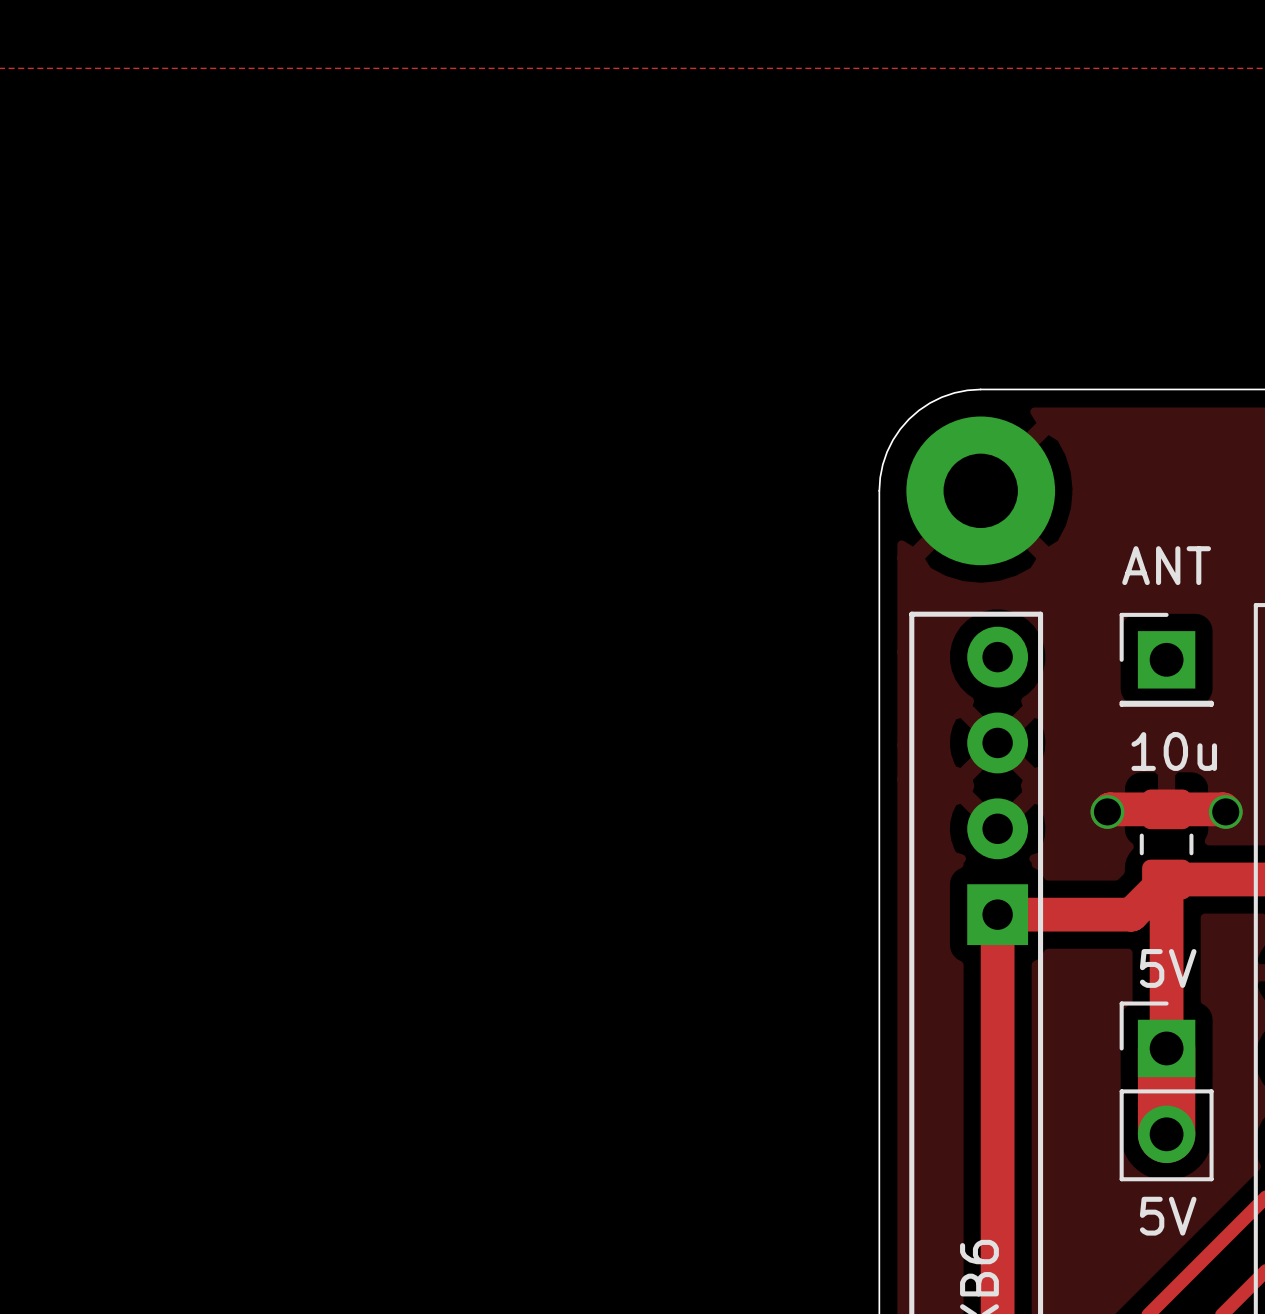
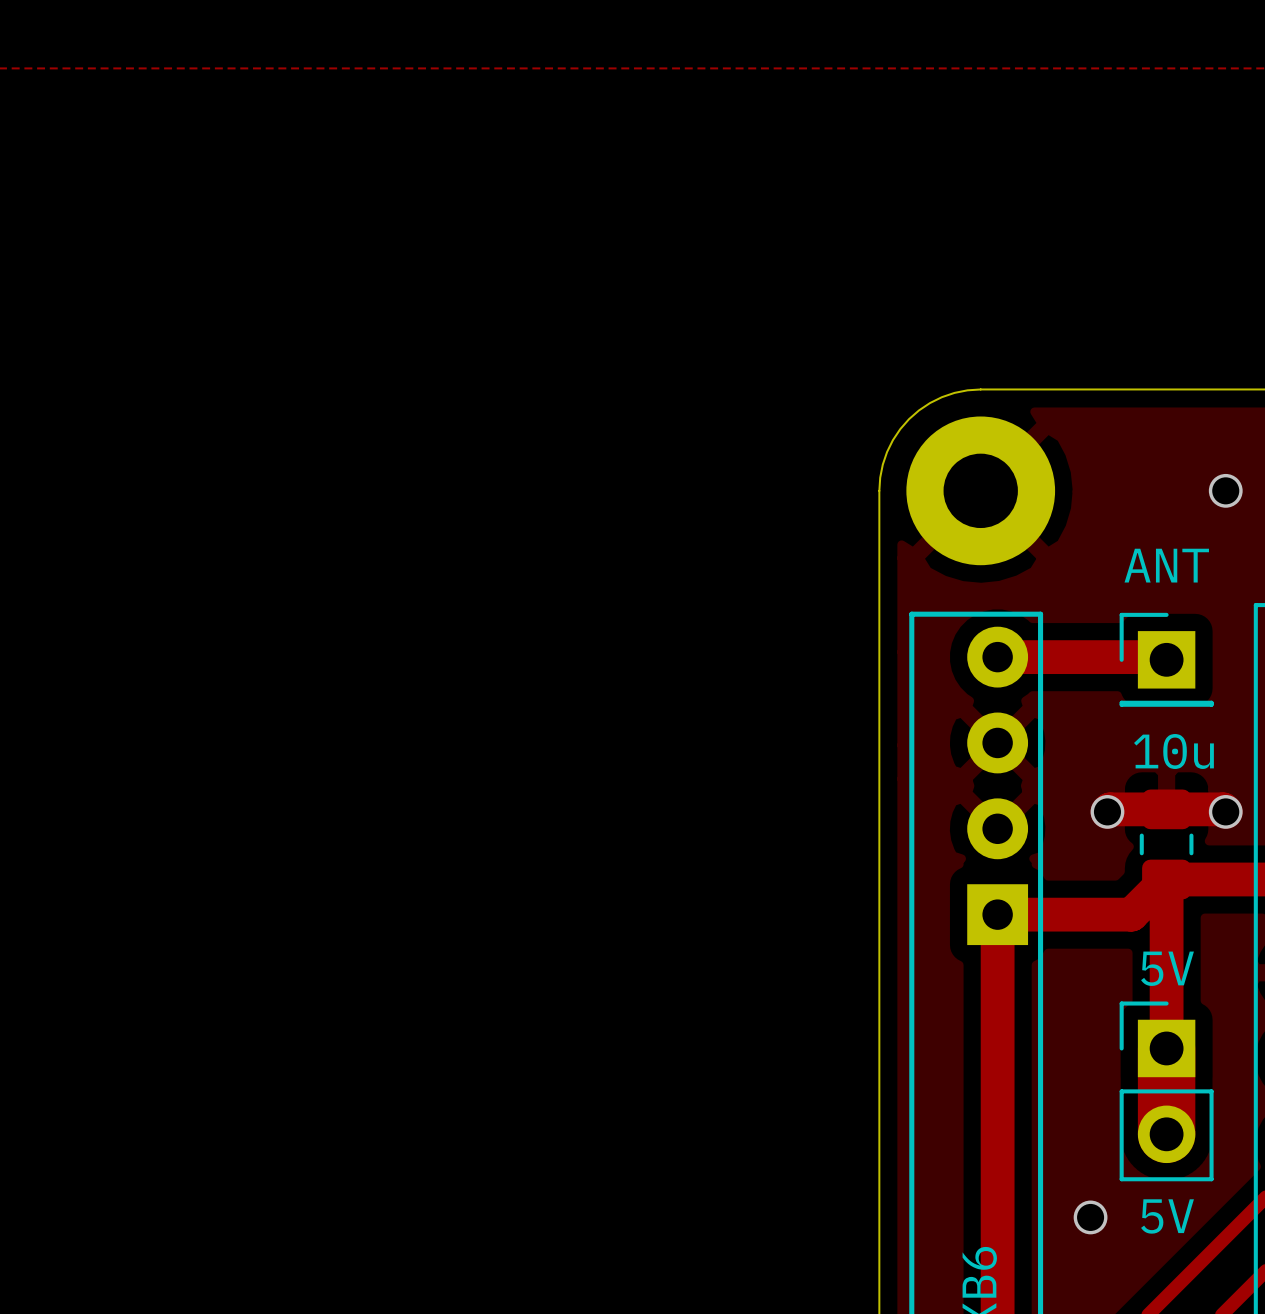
via: none -> (1225, 490)
track: none -> (997, 657) (1163, 657) (1166, 659)
via: none -> (1090, 1217)

